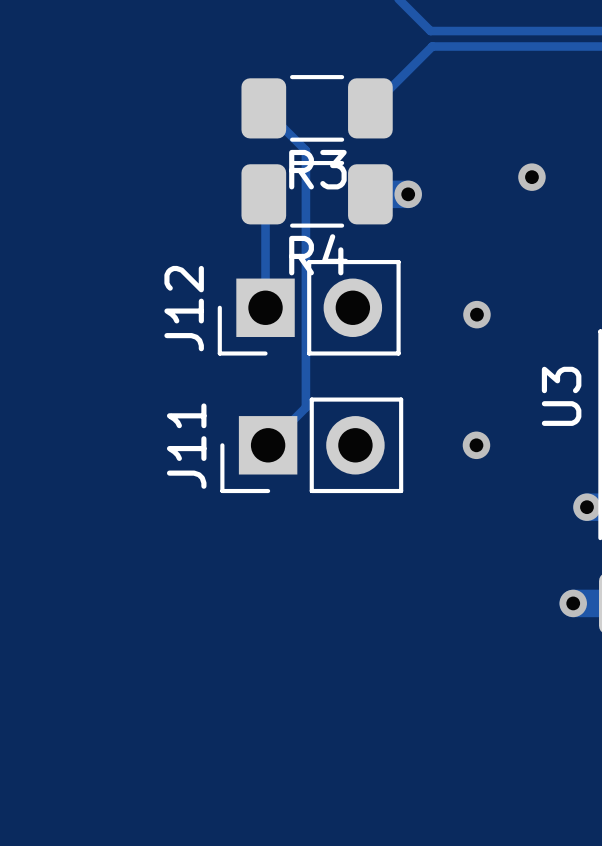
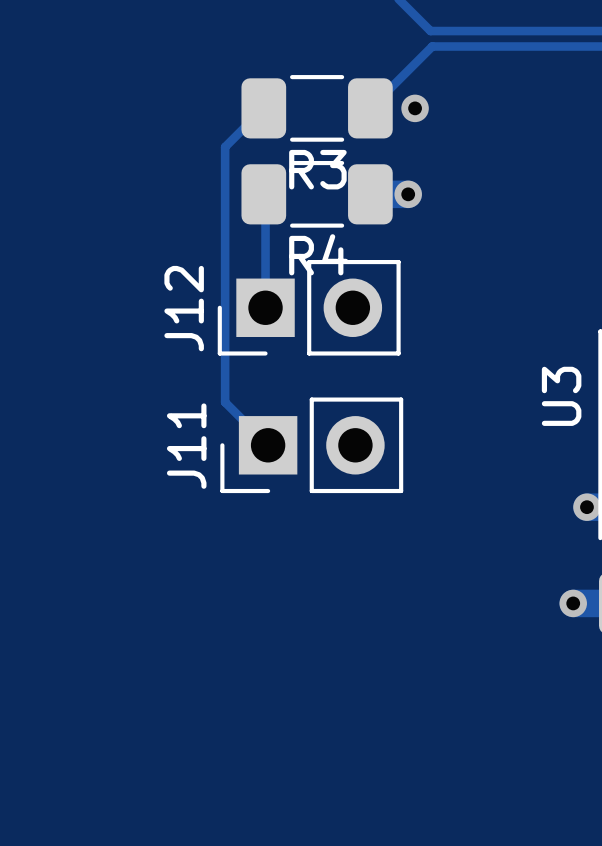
track: (263, 108) (305, 150) (305, 407) (268, 445) -> (263, 108) (225, 147) (225, 402) (268, 445)
via: none -> (415, 108)
via: (531, 177) -> none
via: (476, 314) -> none
via: (476, 445) -> none

